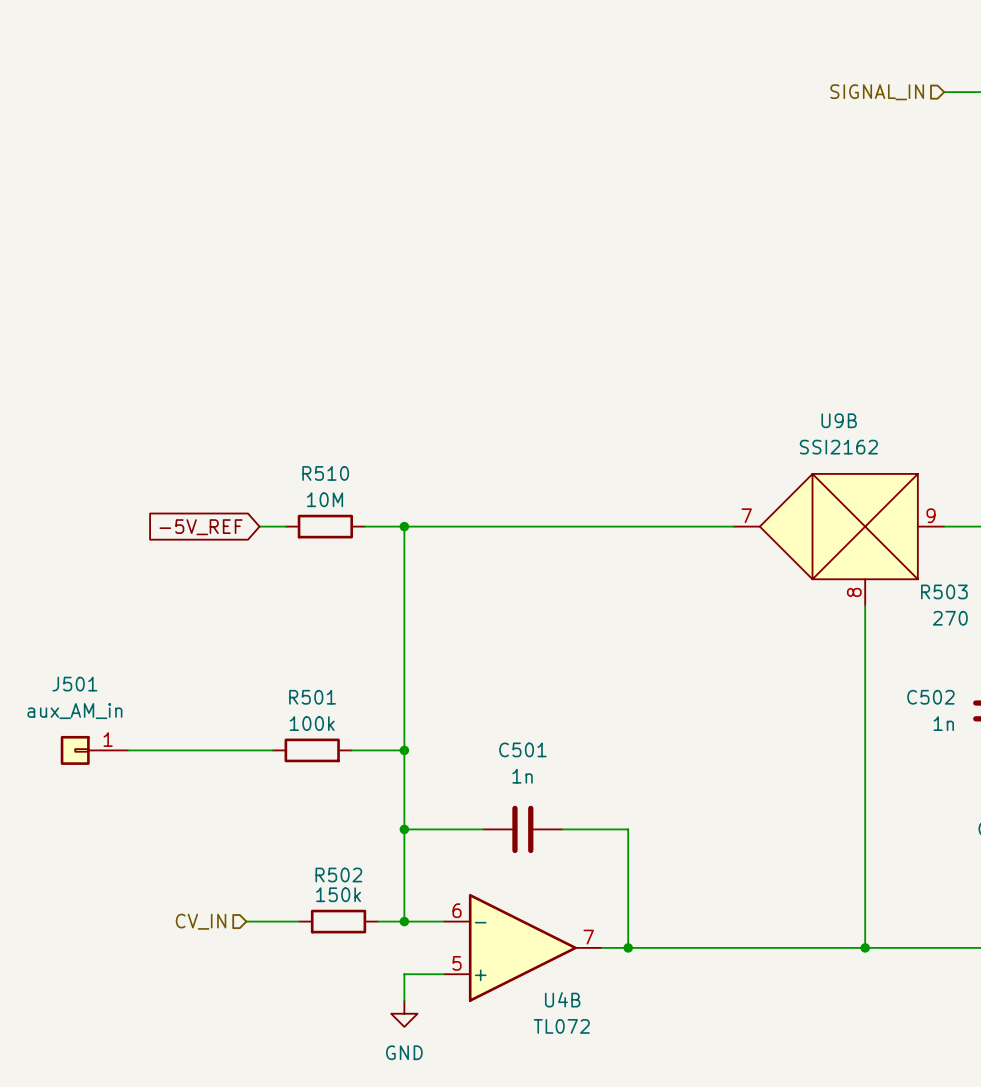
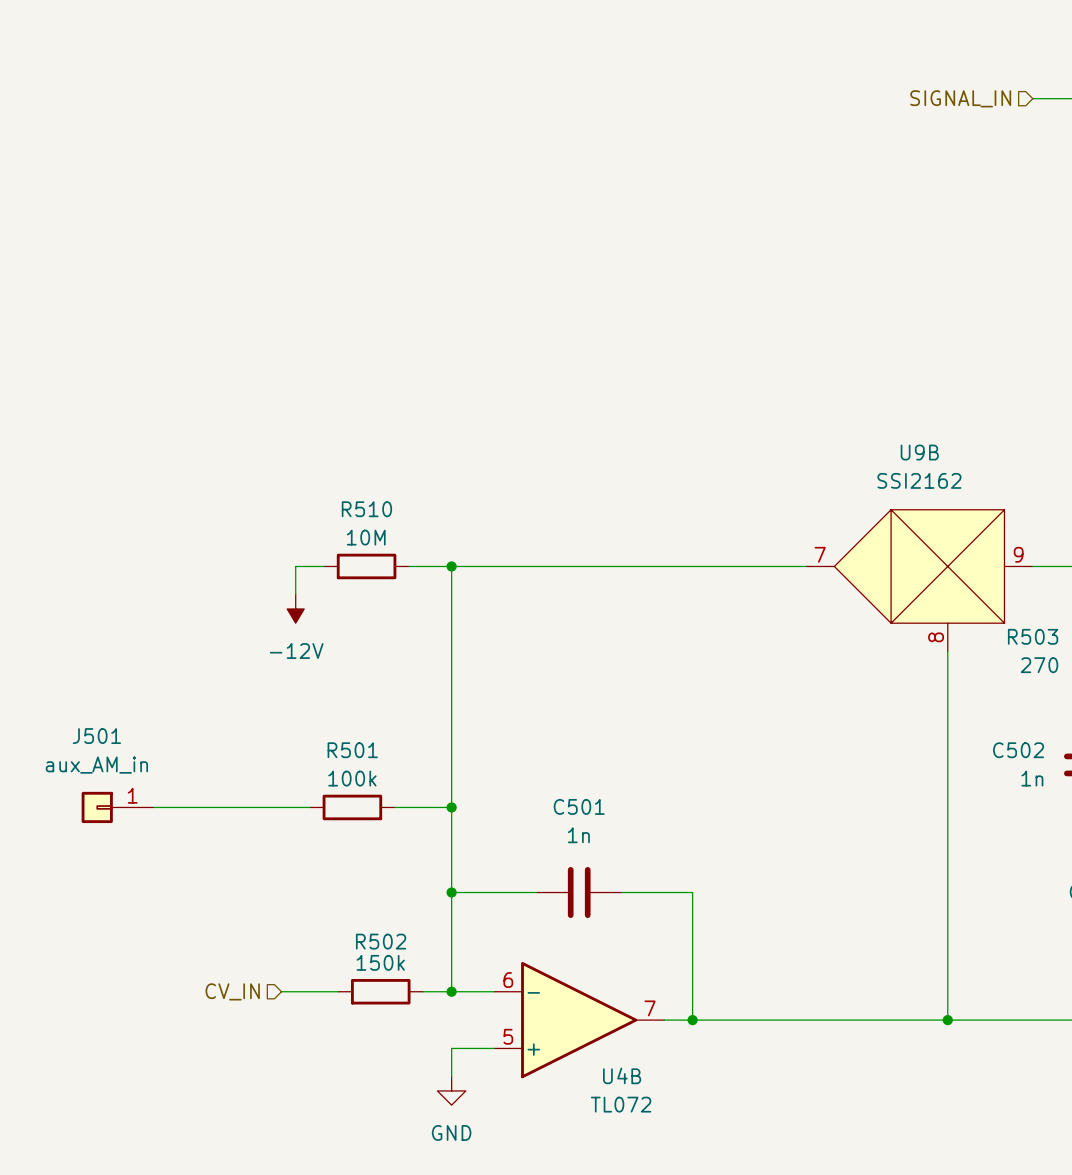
wire: none -> (295, 566) (295, 594)
global label: -5V_REF (201, 527) -> none
power symbol: none -> -12V (295, 609)

